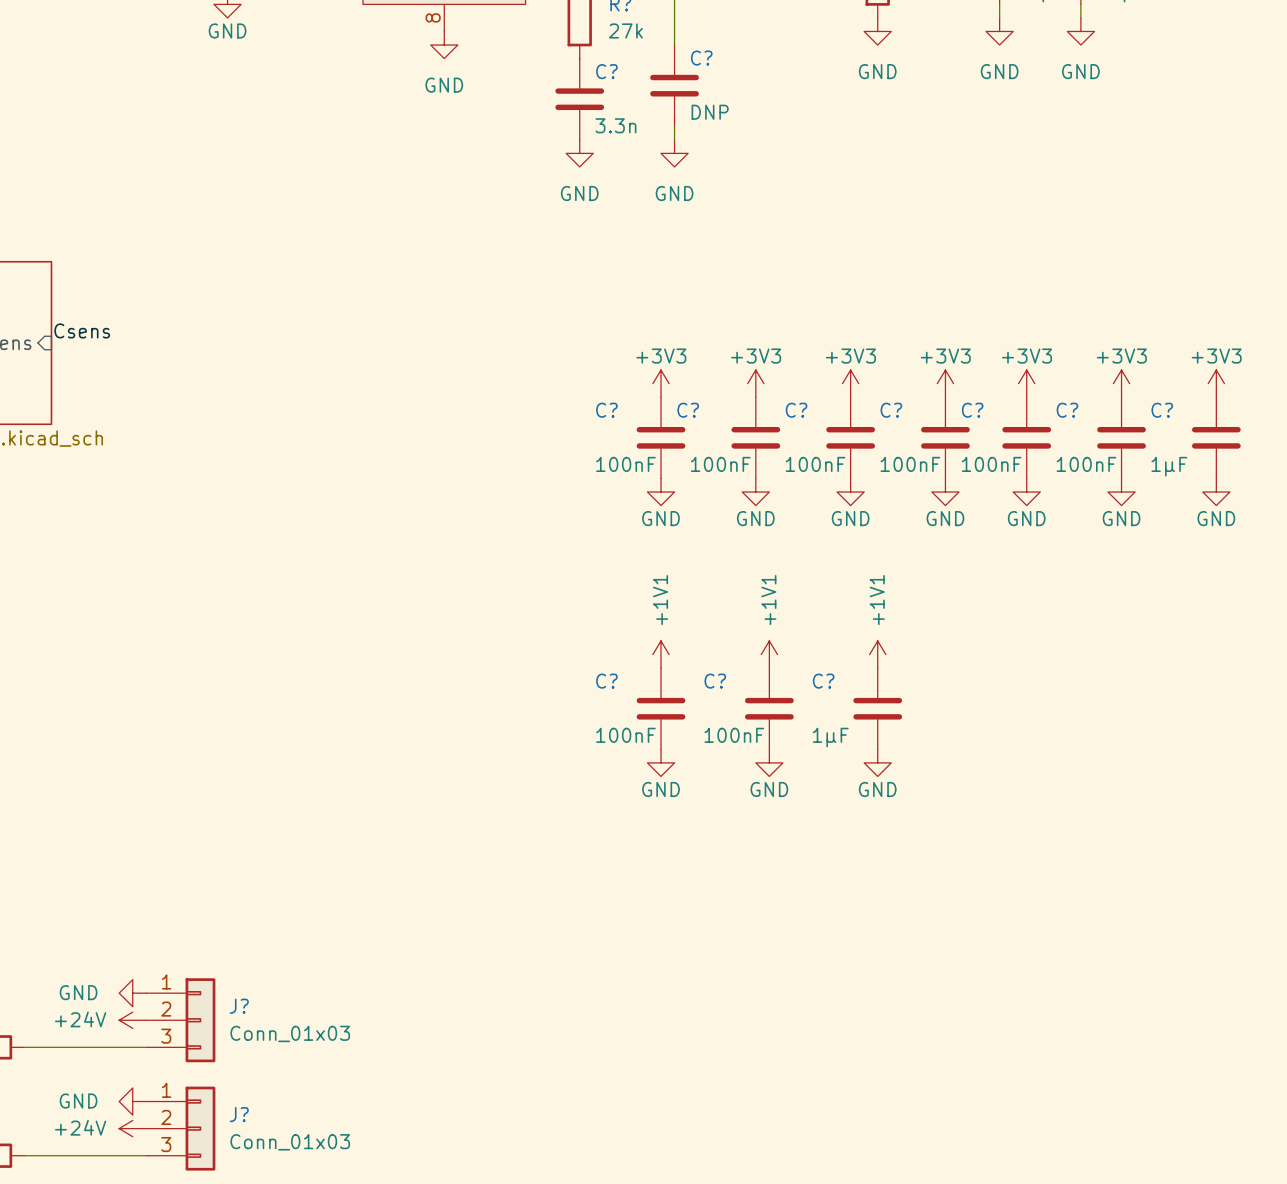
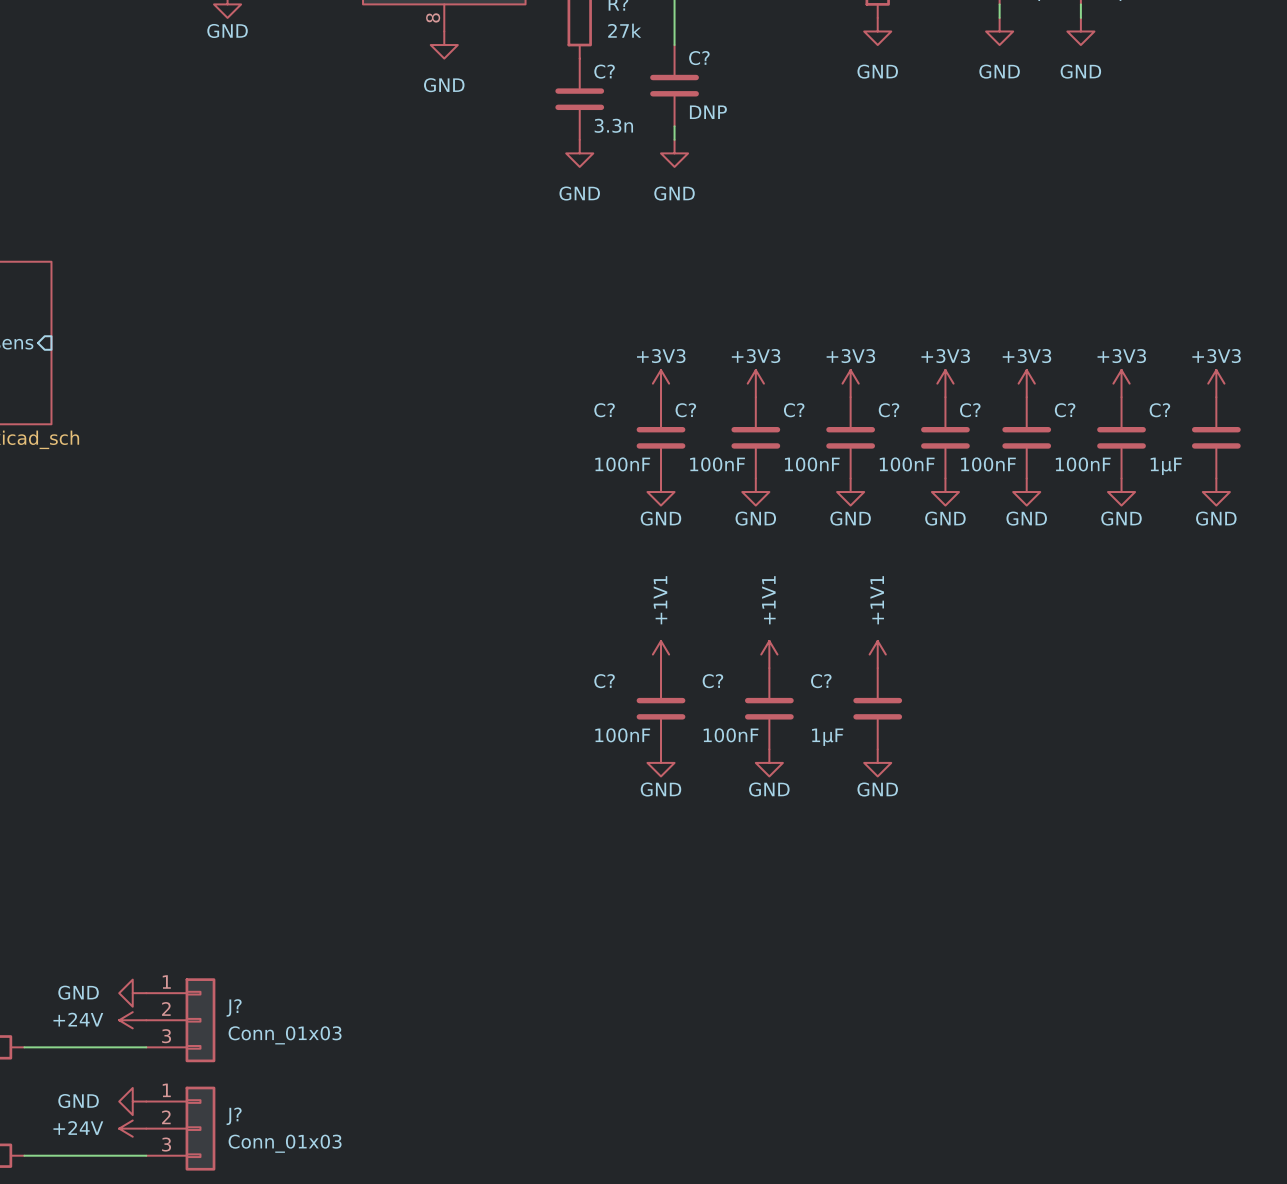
label: Csens (82, 330) -> none

